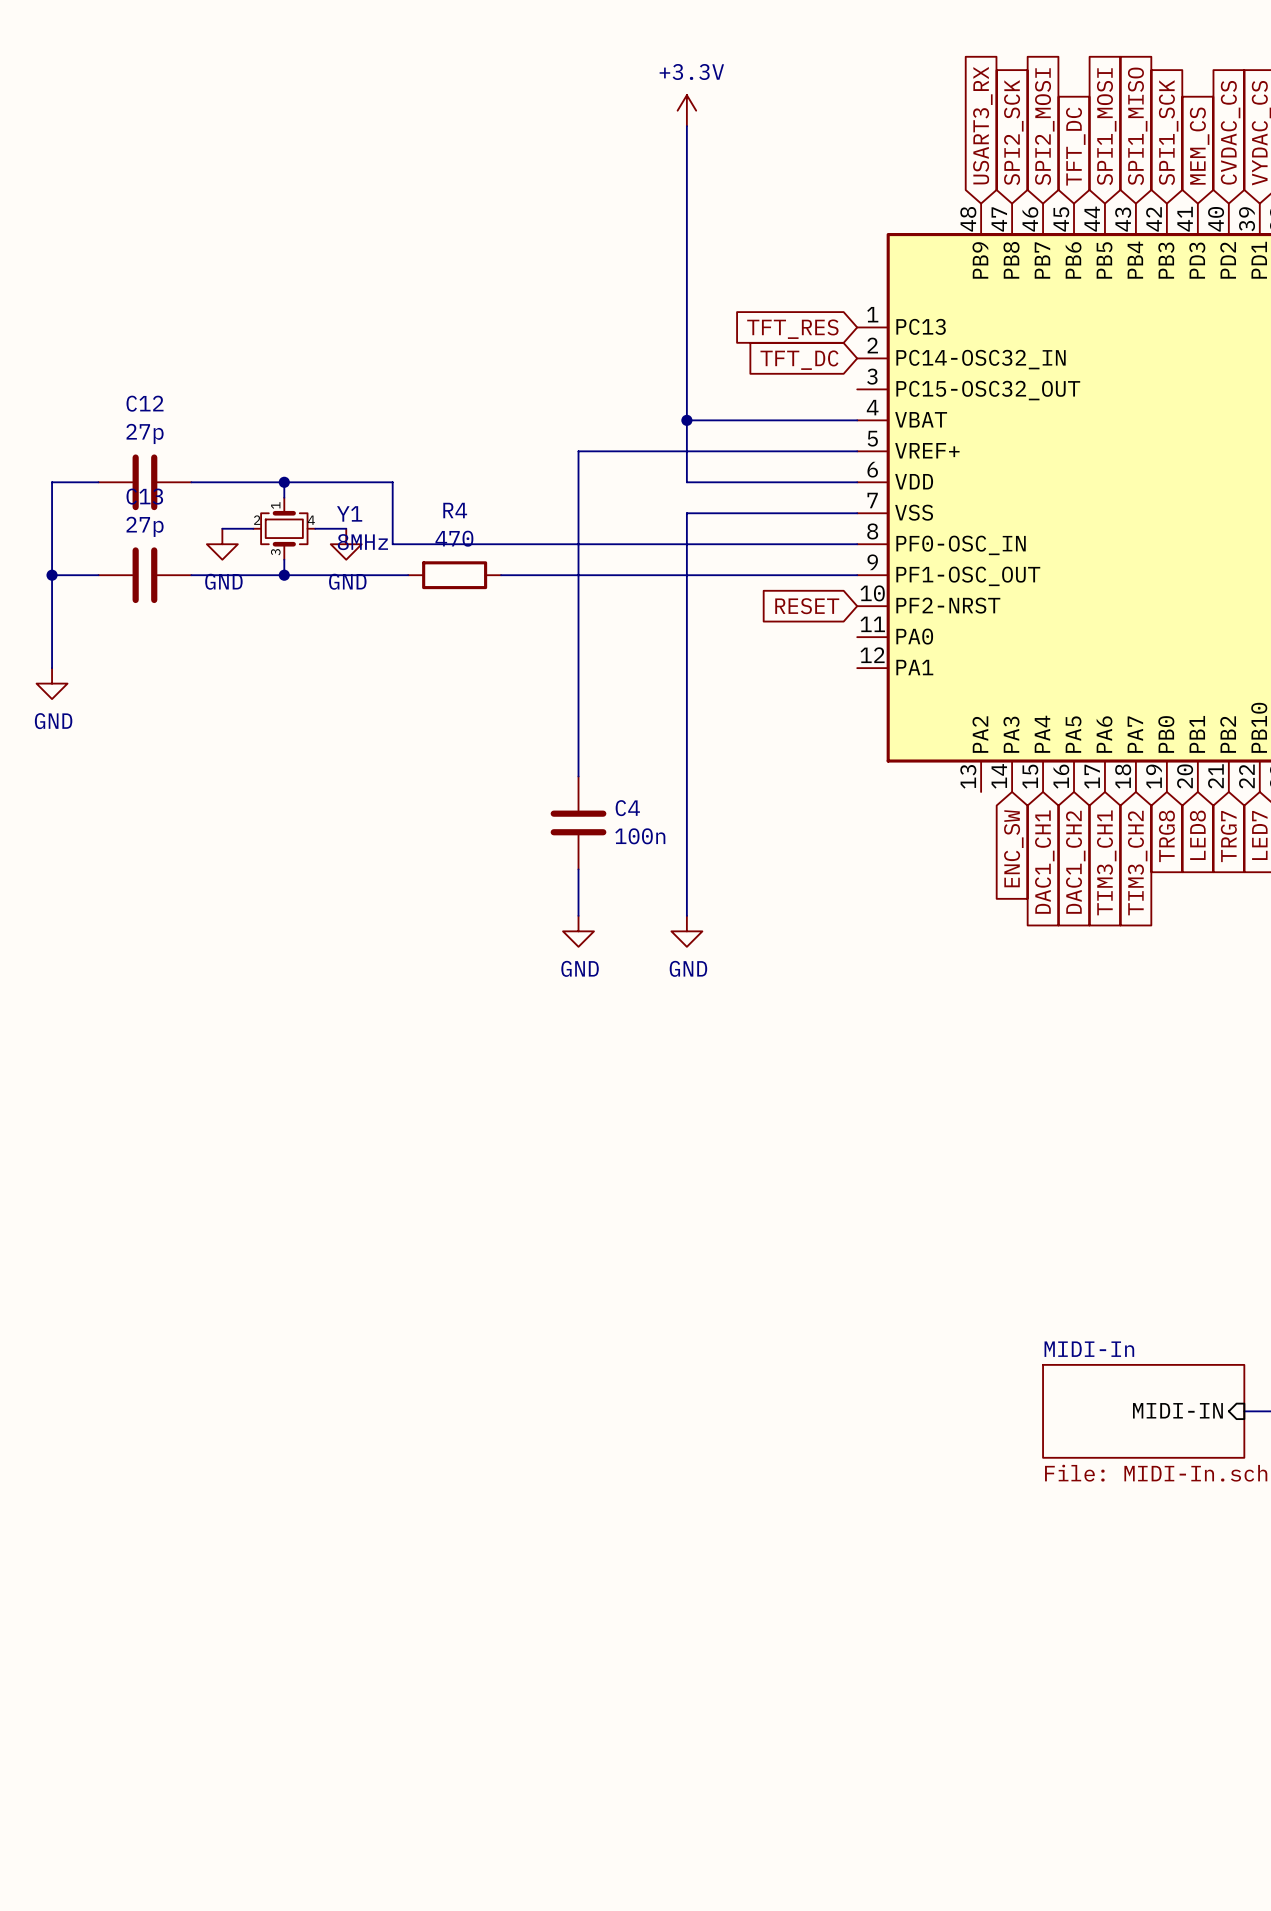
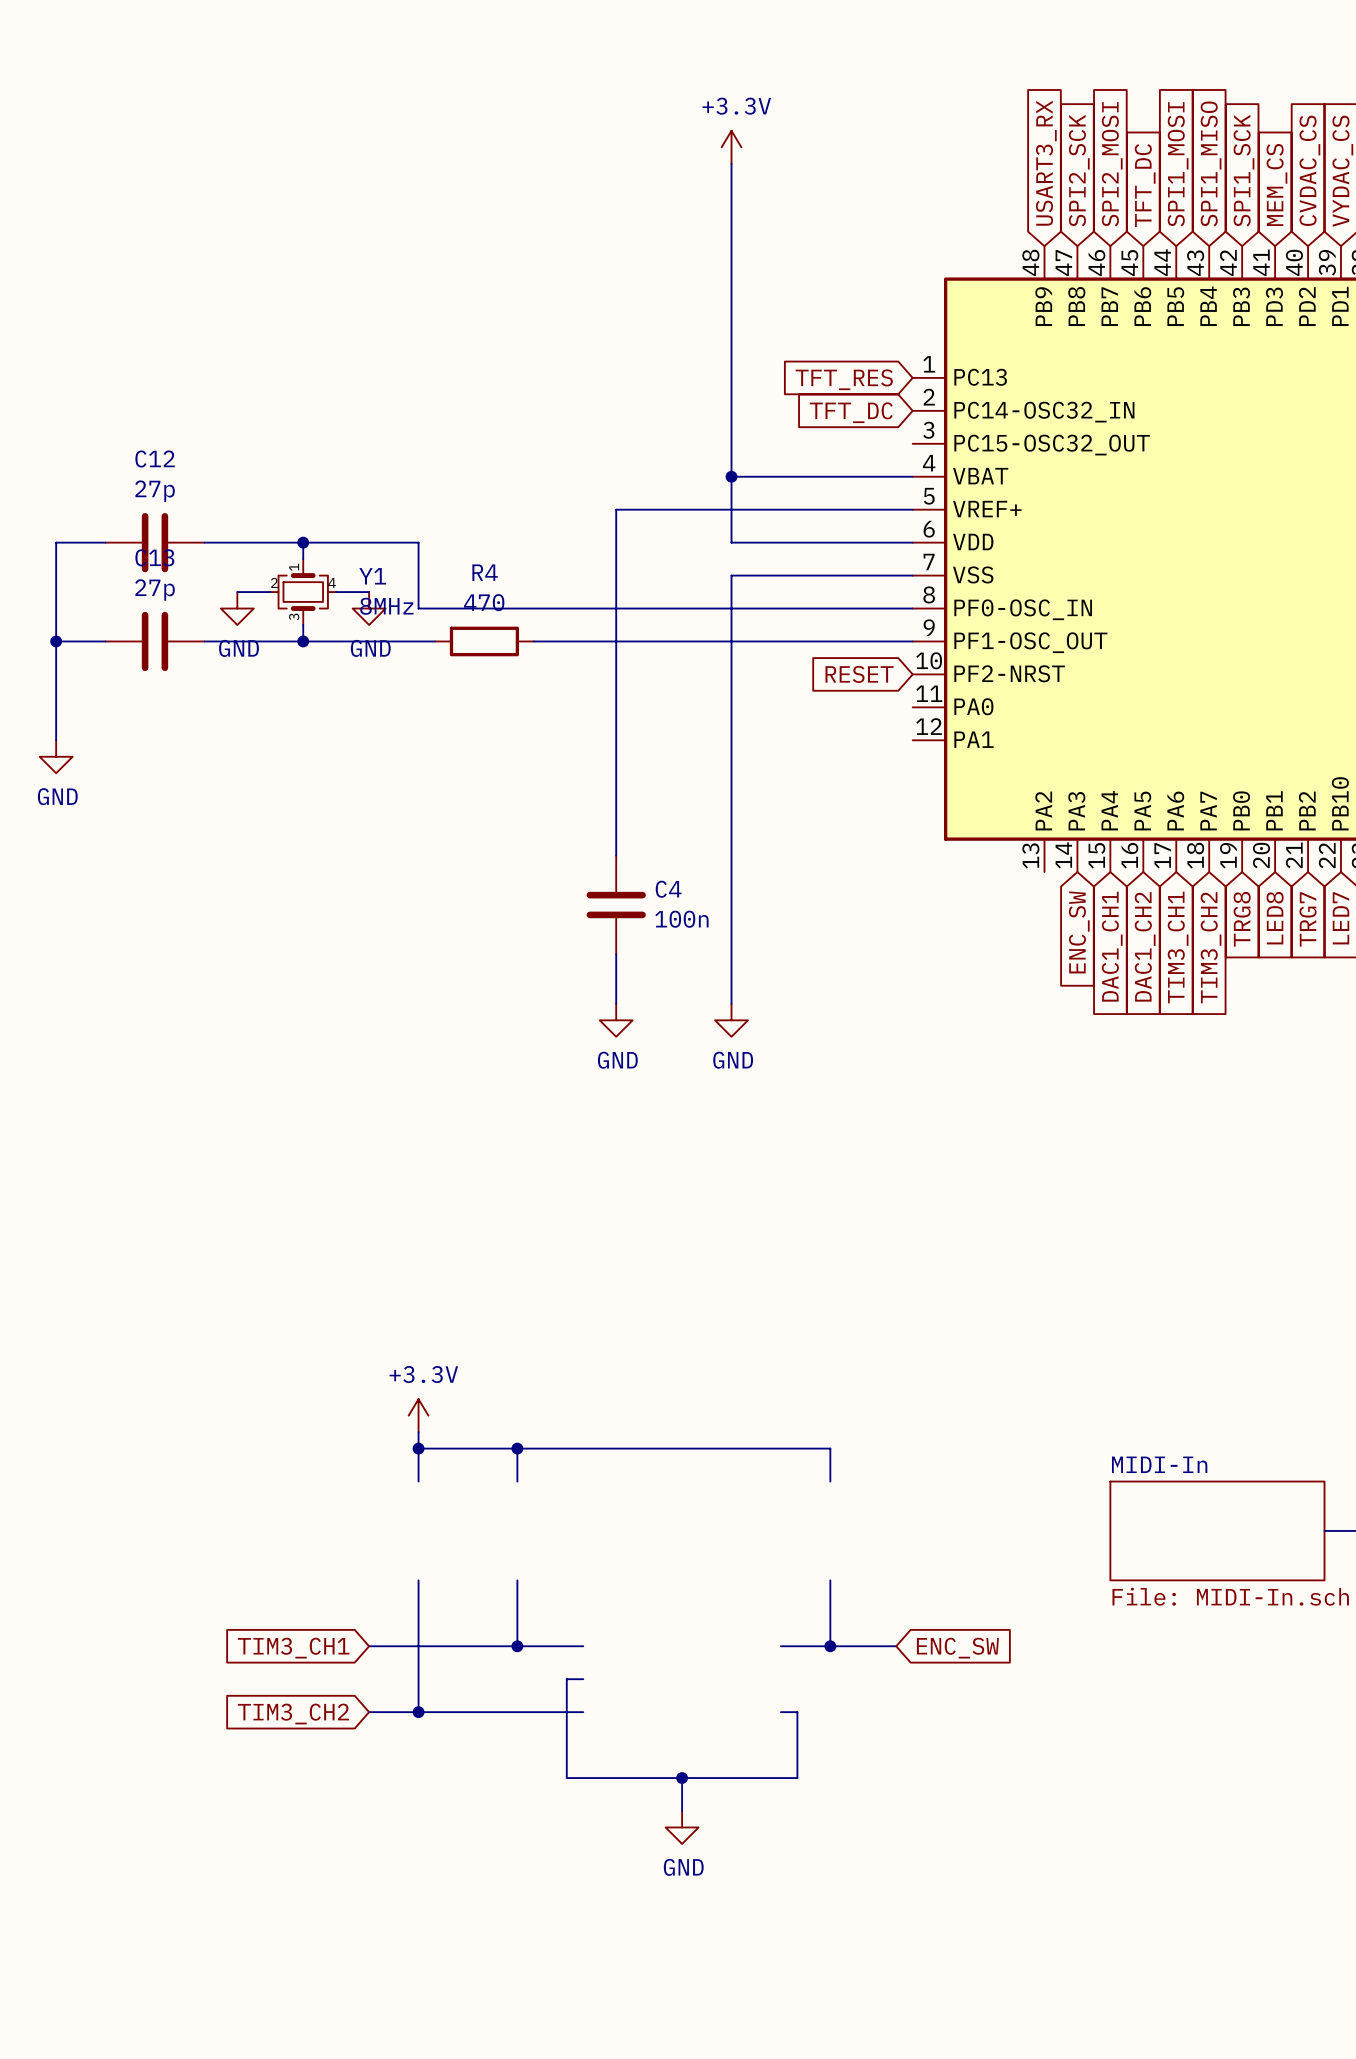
power symbol: none -> +3.3V (418, 1415)
wire: none -> (418, 1432) (418, 1481)
wire: none -> (418, 1448) (830, 1448) (830, 1481)
junction: none -> (418, 1448)
wire: none -> (517, 1448) (517, 1481)
junction: none -> (517, 1448)
sheet pin: MIDI-IN (1177, 1410) -> none
wire: none -> (418, 1580) (418, 1712)
wire: none -> (517, 1580) (517, 1646)
wire: none -> (830, 1580) (830, 1646)
wire: none -> (369, 1646) (583, 1646)
junction: none -> (517, 1646)
wire: none -> (780, 1646) (896, 1646)
junction: none -> (830, 1646)
global label: none -> TIM3_CH1 (293, 1648)
global label: none -> ENC_SW (957, 1648)
wire: none -> (583, 1679) (566, 1679) (566, 1778) (797, 1778) (797, 1712) (780, 1712)
wire: none -> (369, 1712) (583, 1712)
junction: none -> (418, 1712)
global label: none -> TIM3_CH2 (293, 1714)
wire: none -> (682, 1778) (682, 1810)
junction: none -> (682, 1778)
power symbol: none -> GND (682, 1827)

